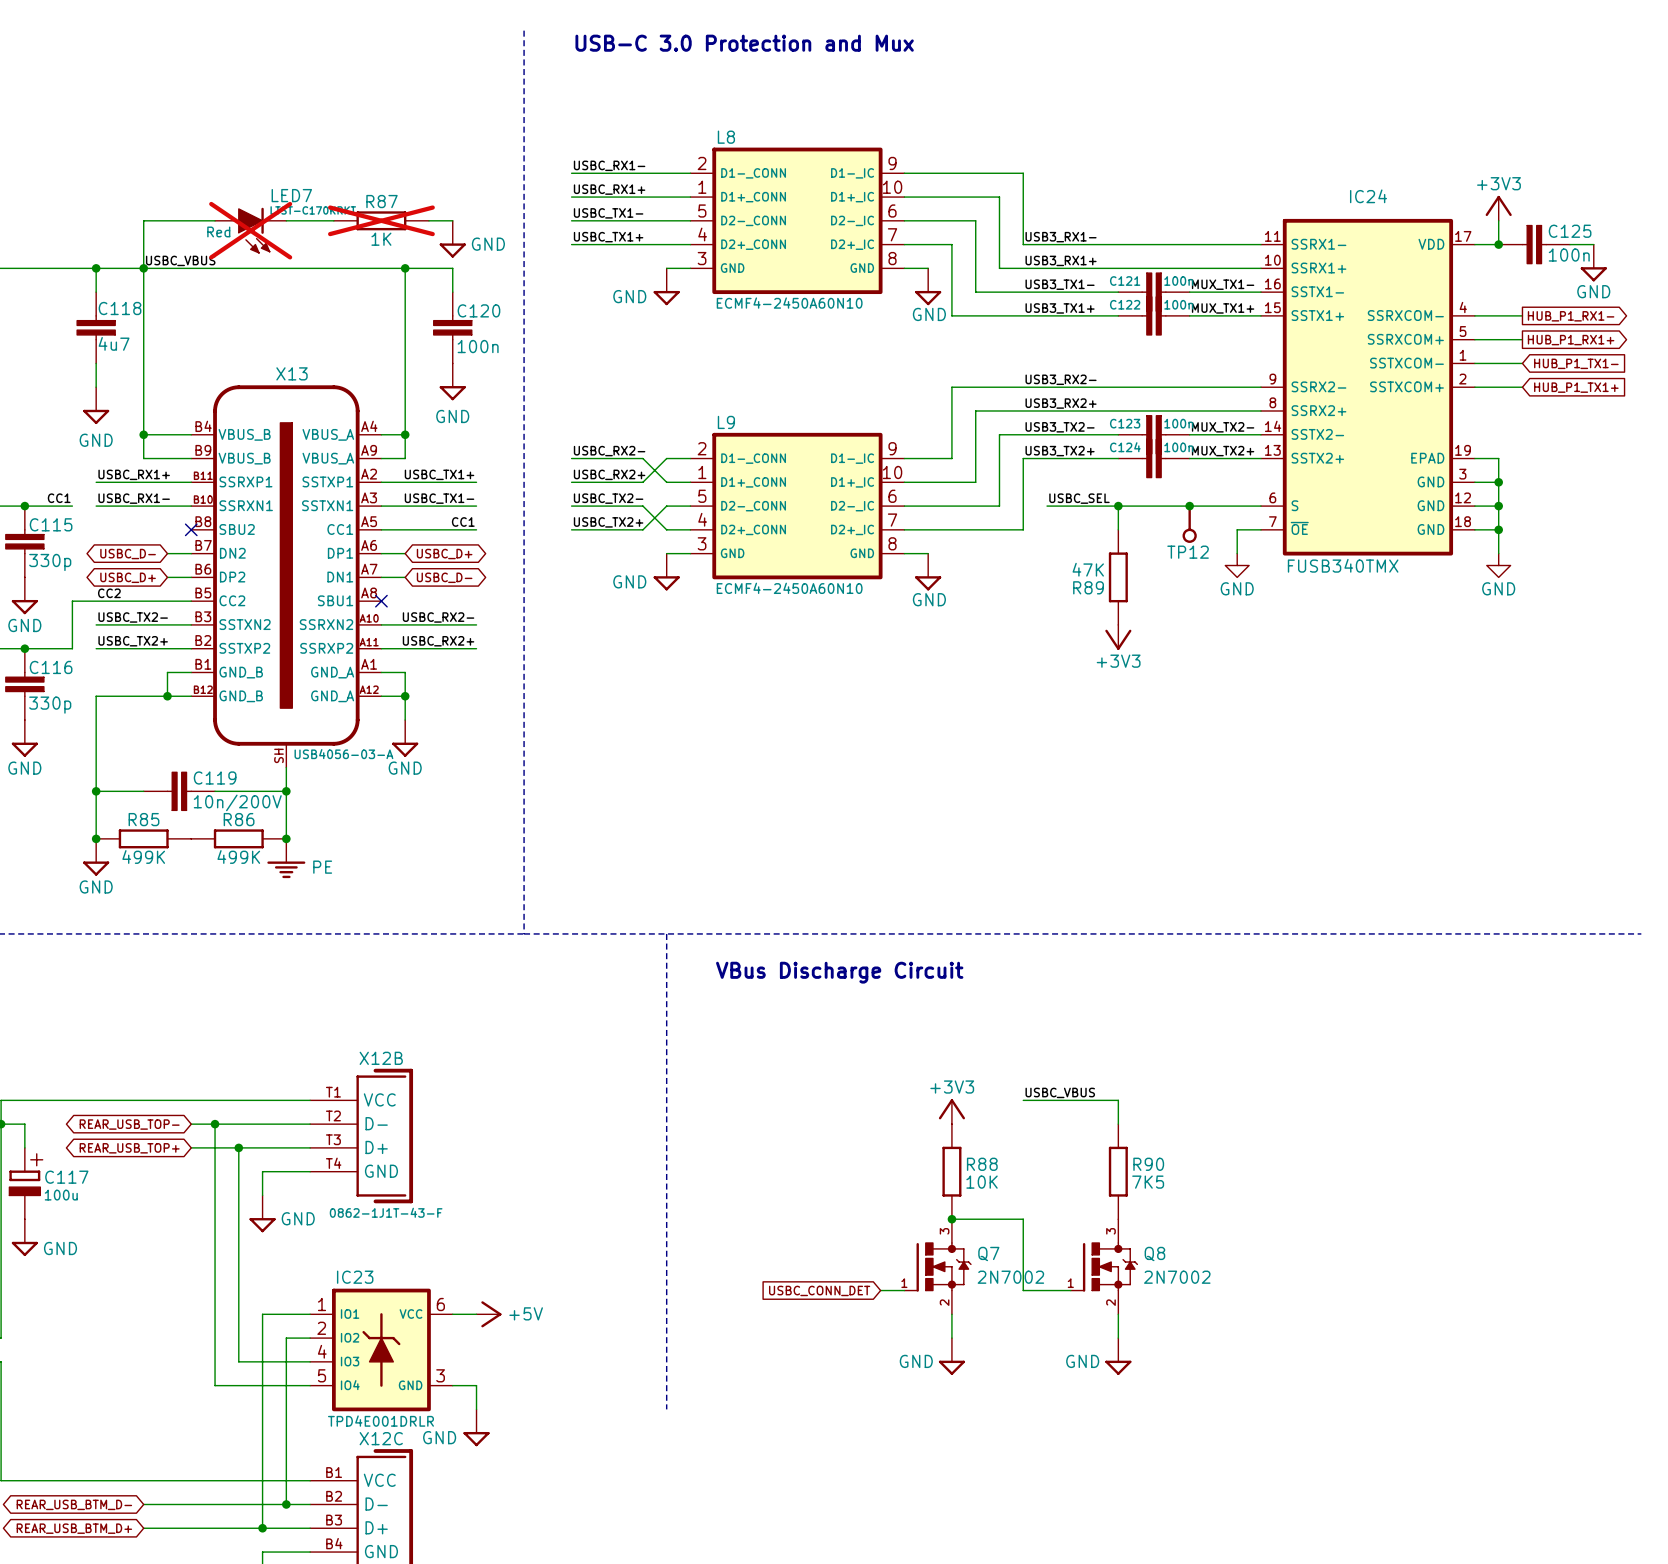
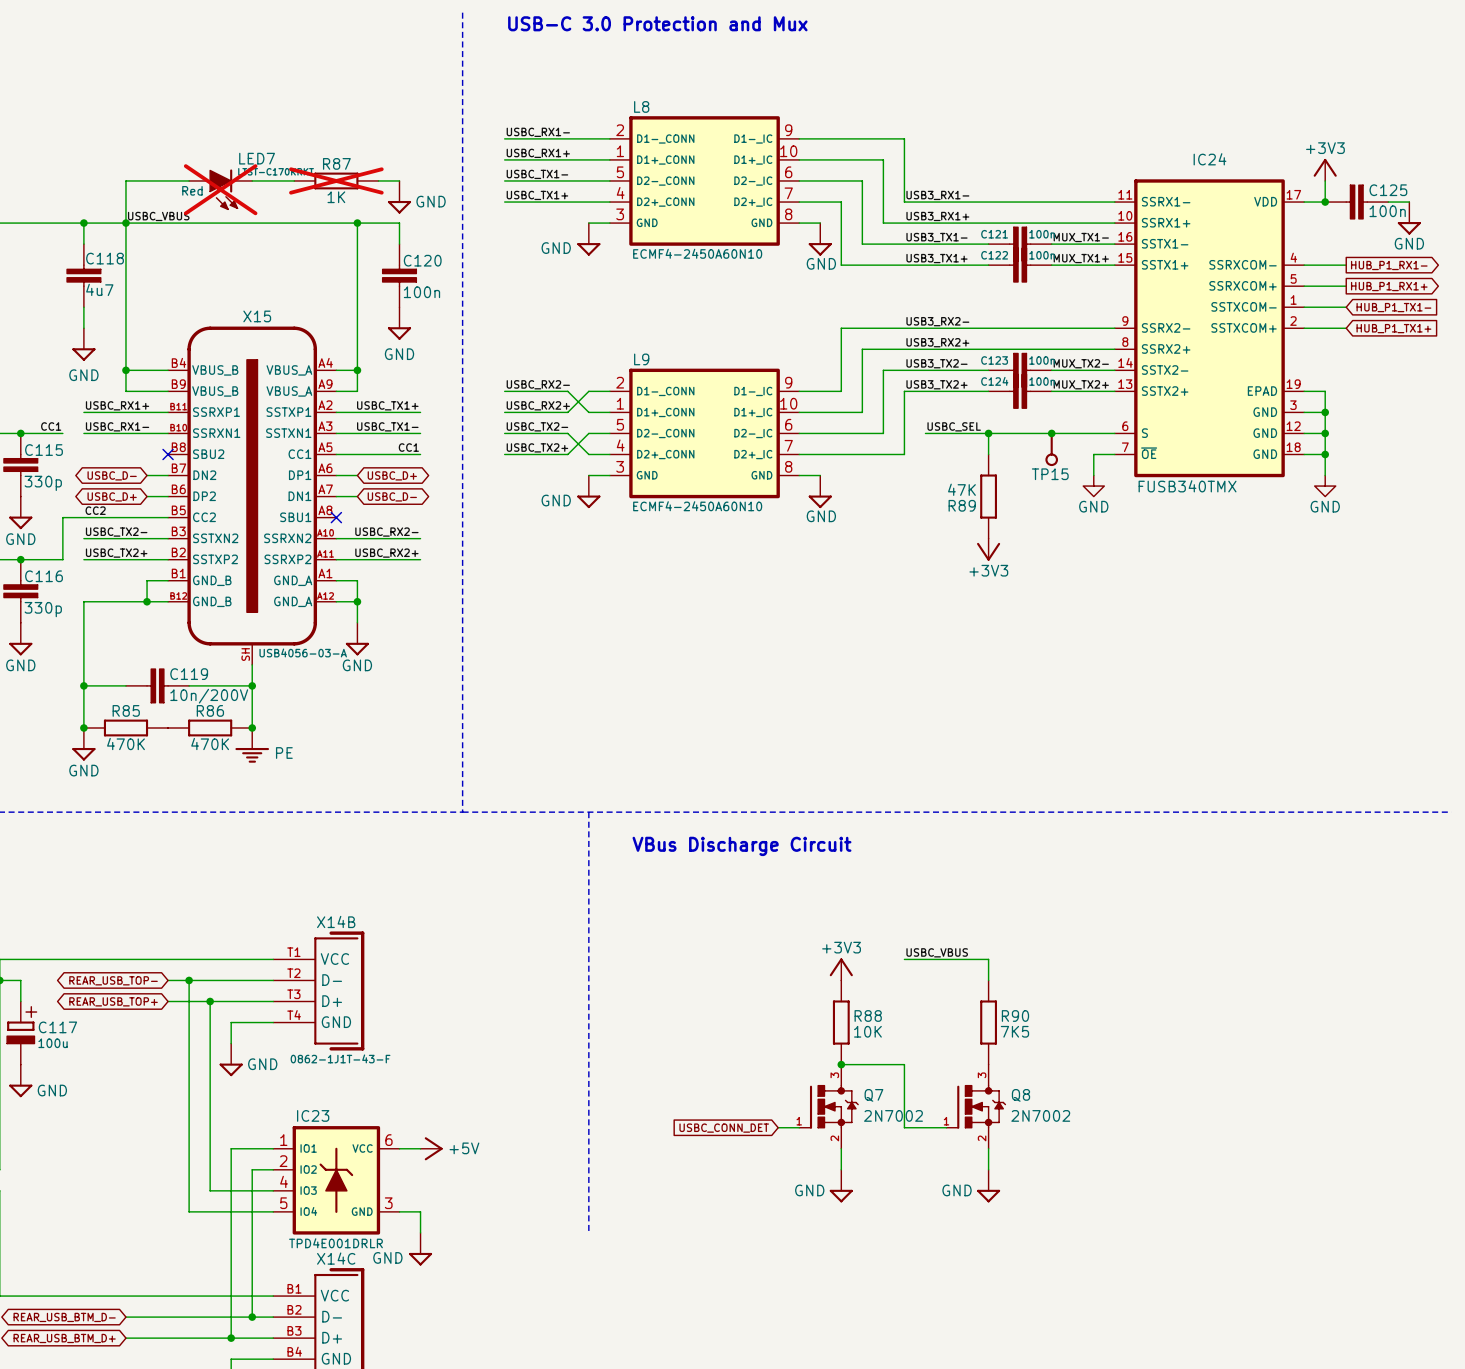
X13 name: X13 (292, 373) -> X15 (257, 316)
TP12 name: TP12 (1188, 552) -> TP15 (1050, 474)
R85 value: 499K (143, 856) -> 470K (125, 744)
R86 value: 499K (238, 856) -> 470K (210, 744)
X12B name: X12B (381, 1058) -> X14B (336, 921)
X12C name: X12C (381, 1438) -> X14C (336, 1258)

